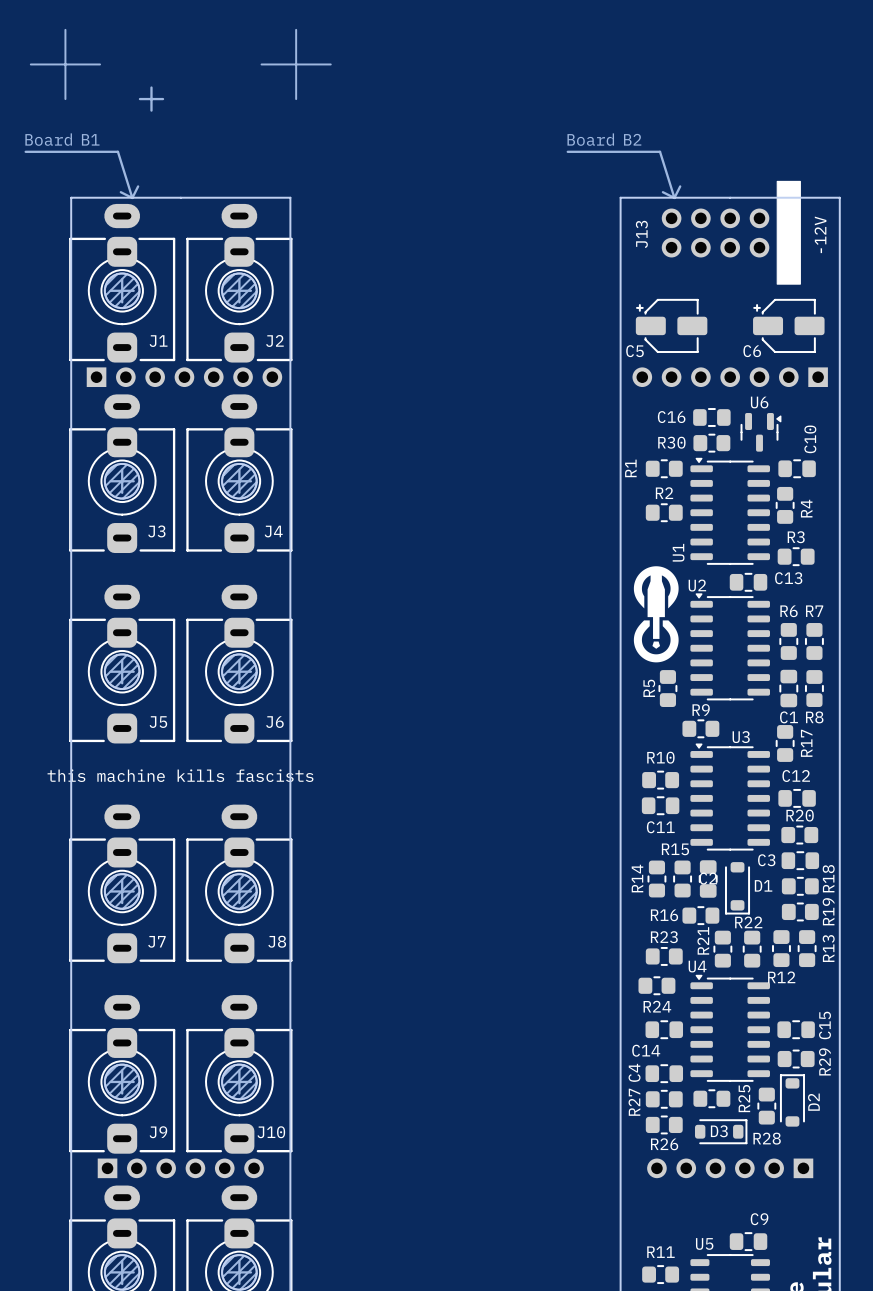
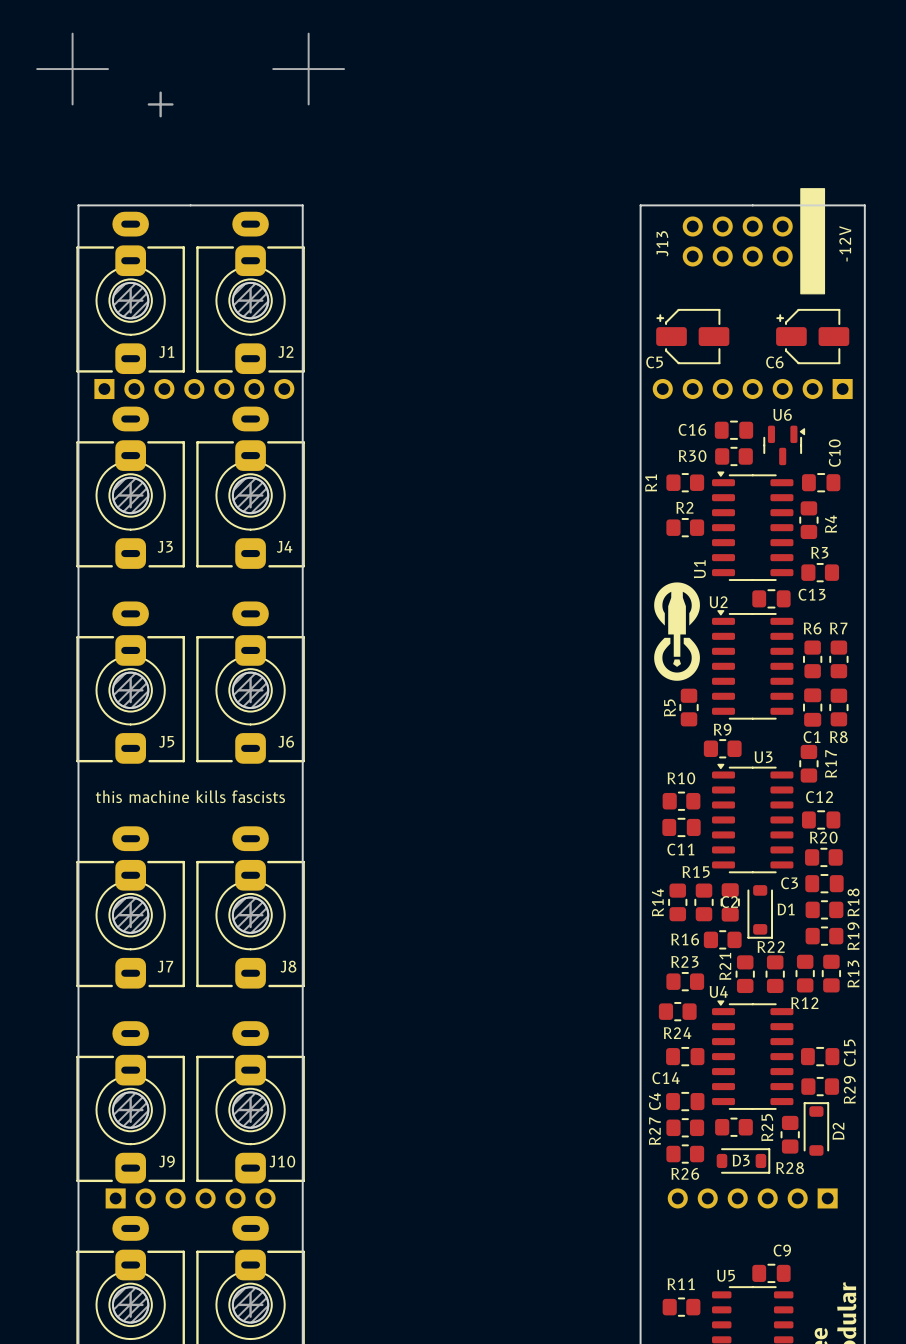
B1: Board (81, 174) -> none
B2: Board (623, 174) -> none

